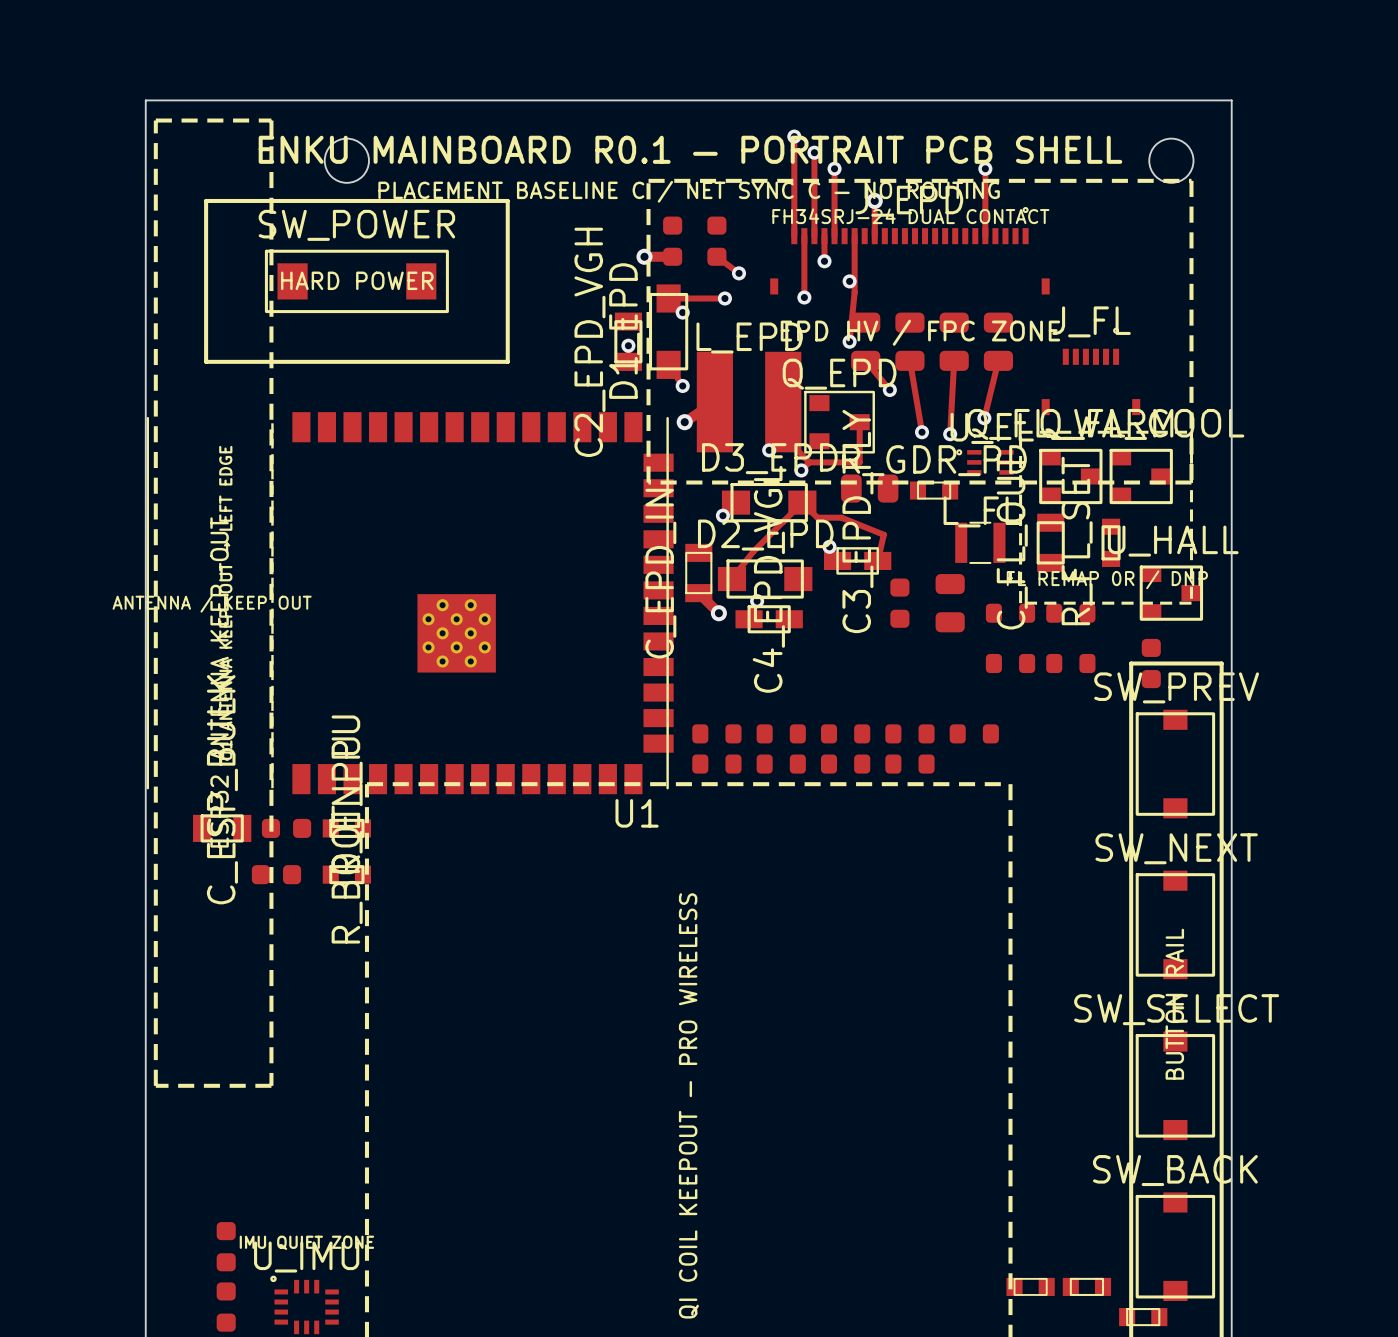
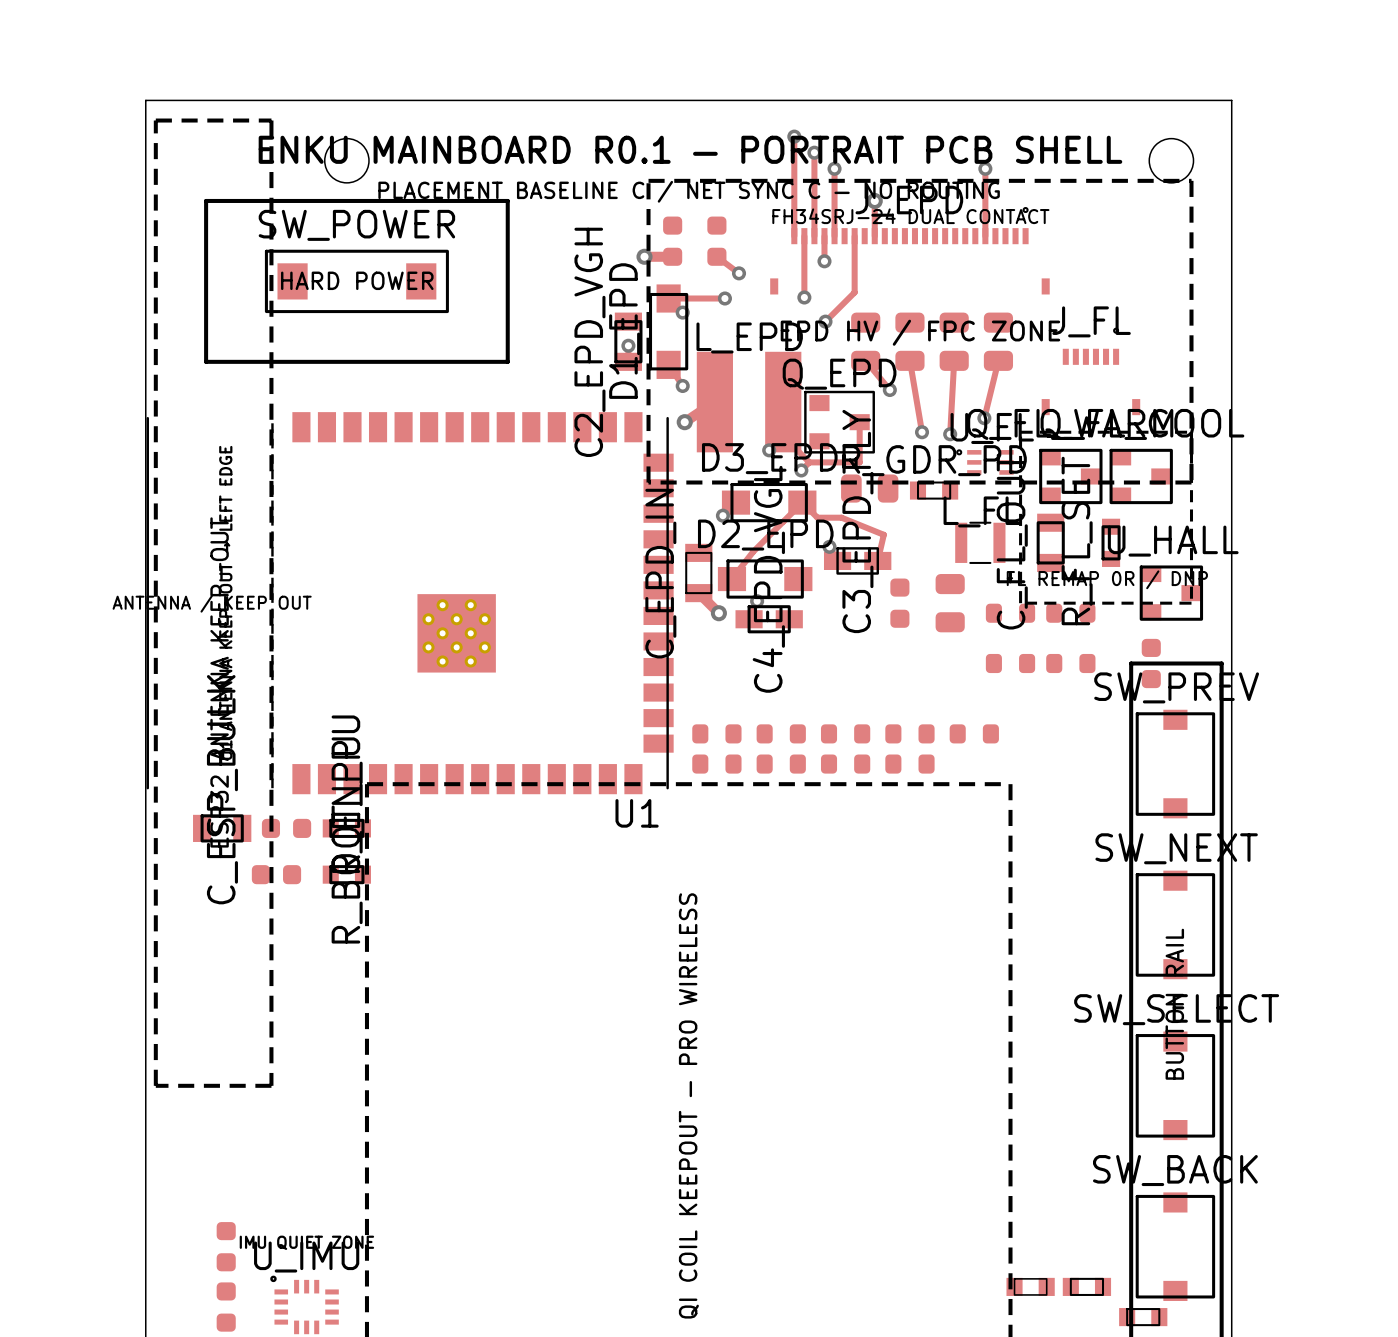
via: (849, 281) -> none
track: (854, 292) (849, 341) -> (854, 292) (825, 321)
via: none -> (825, 321)
via: (849, 341) -> none

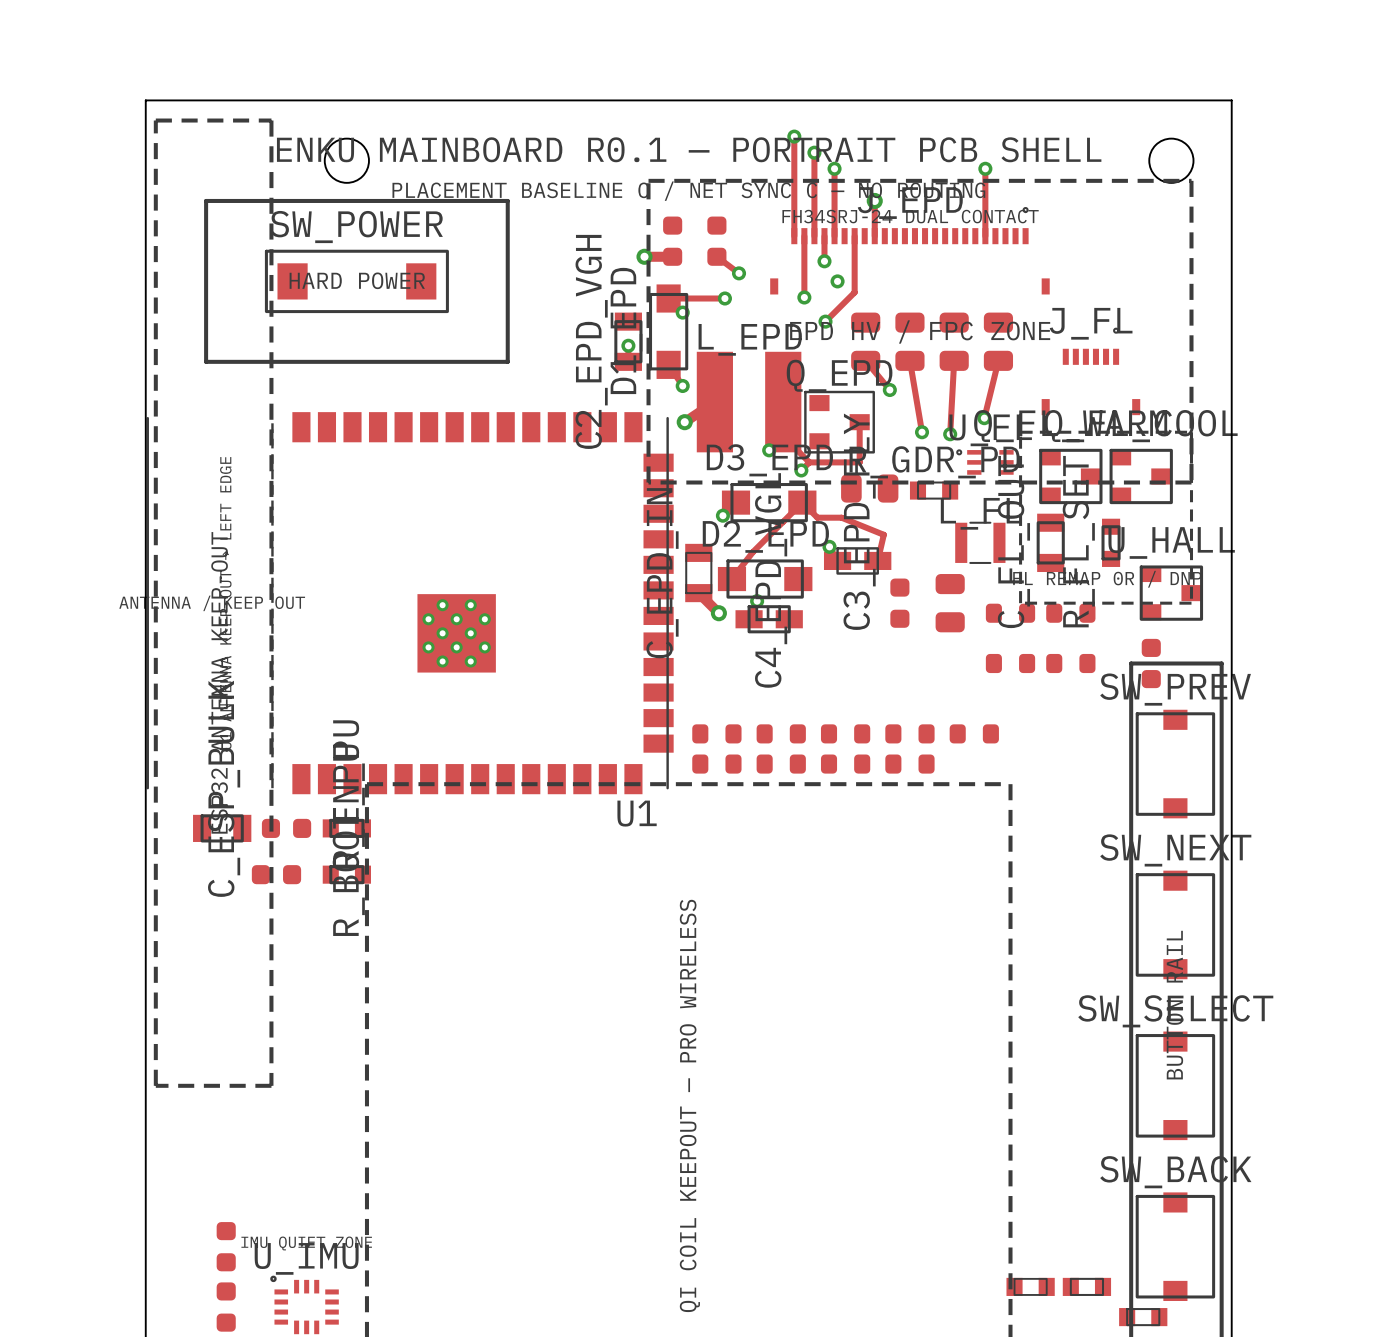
via: none -> (837, 281)

